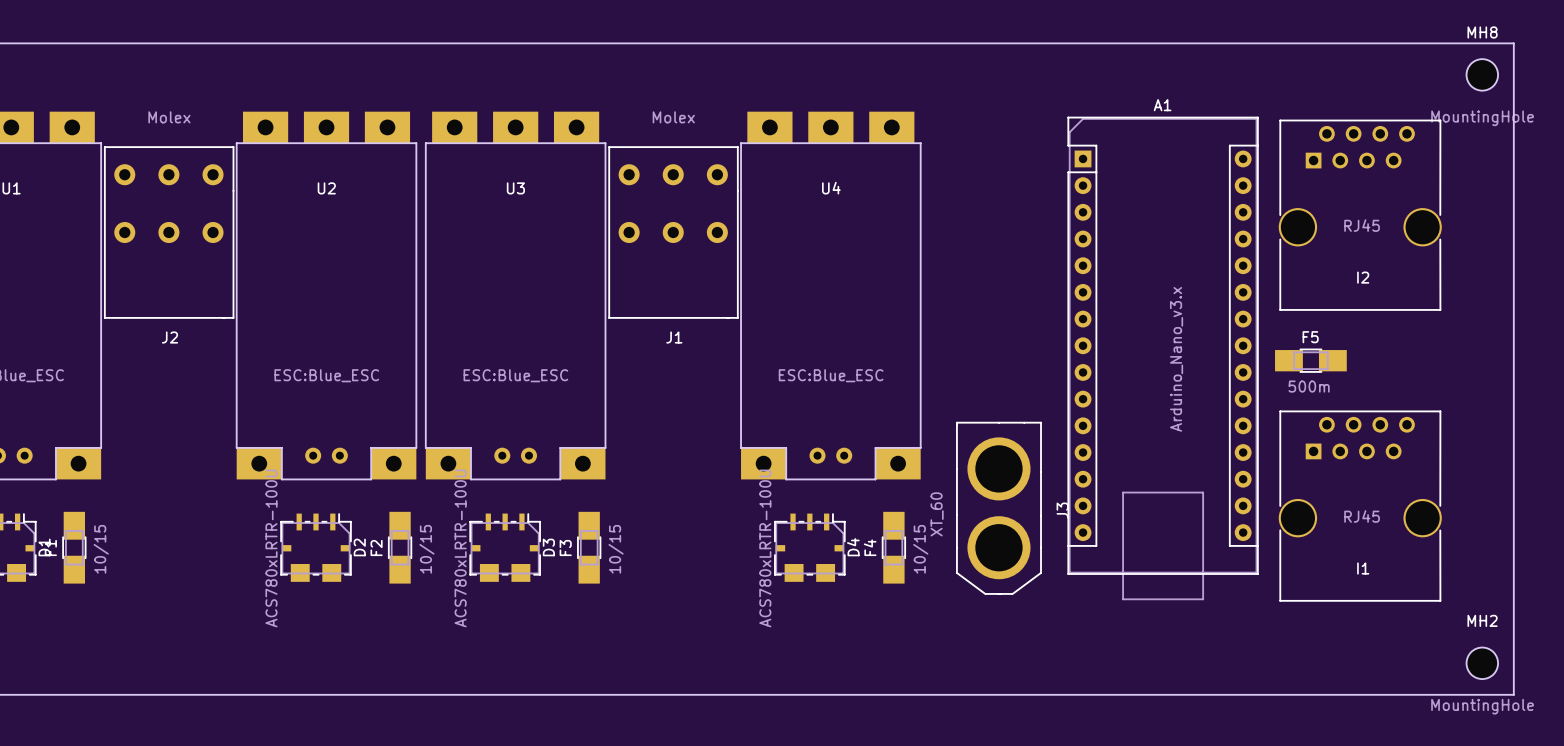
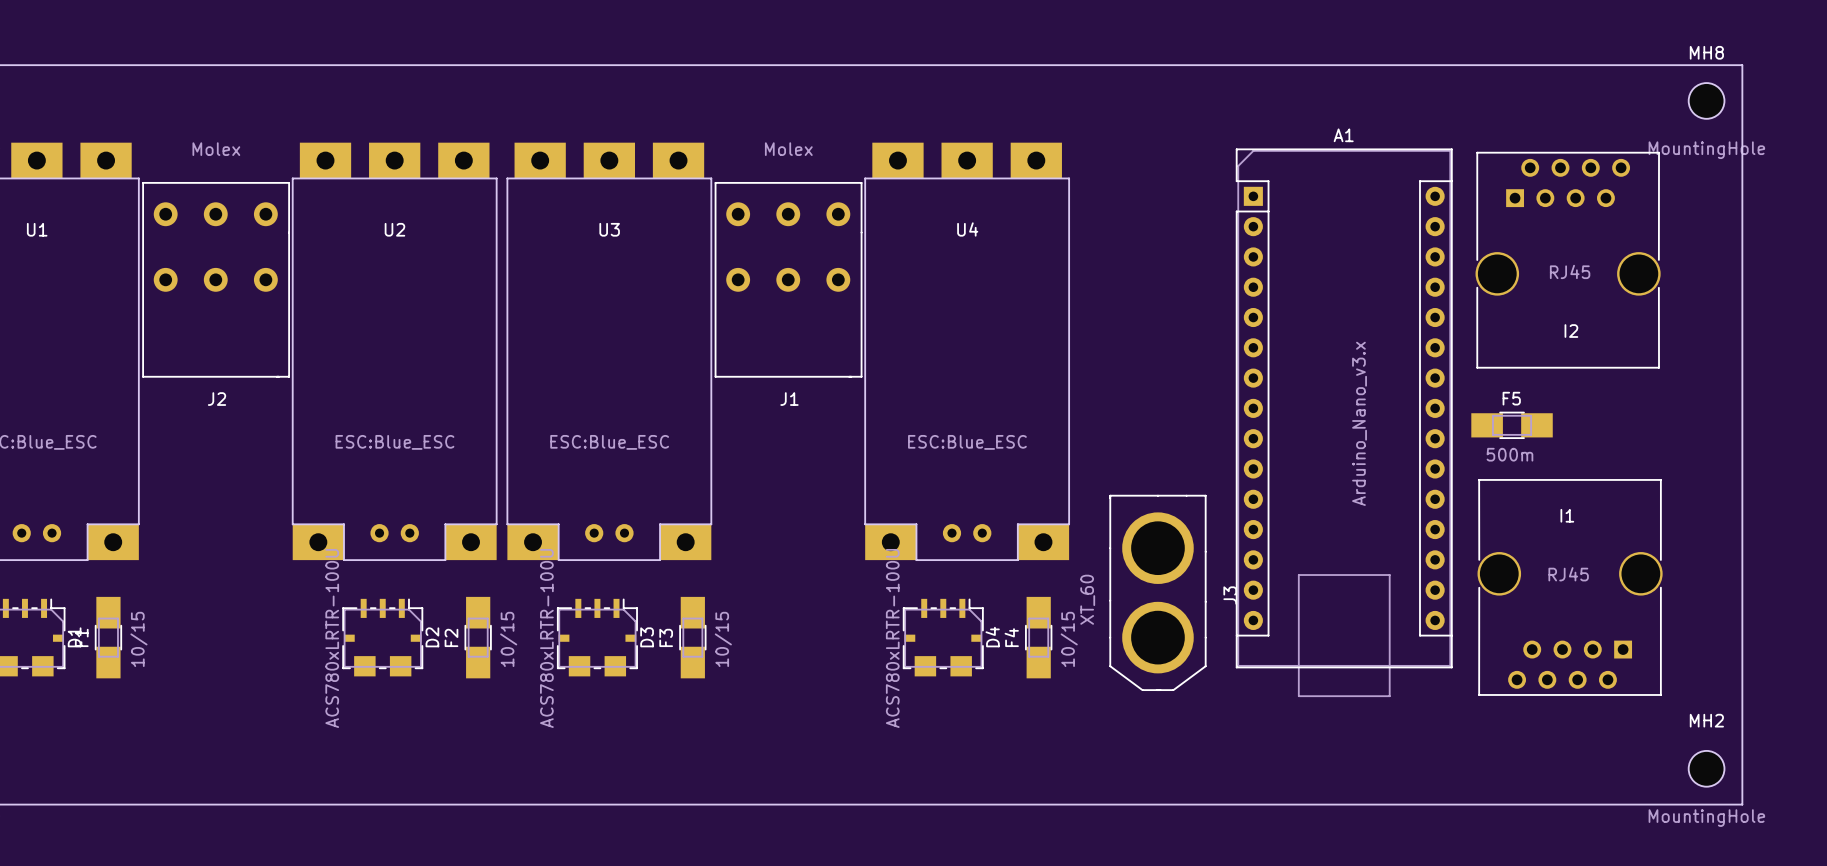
I1 rotation: 0° (1360, 506) -> 180° (1570, 587)

